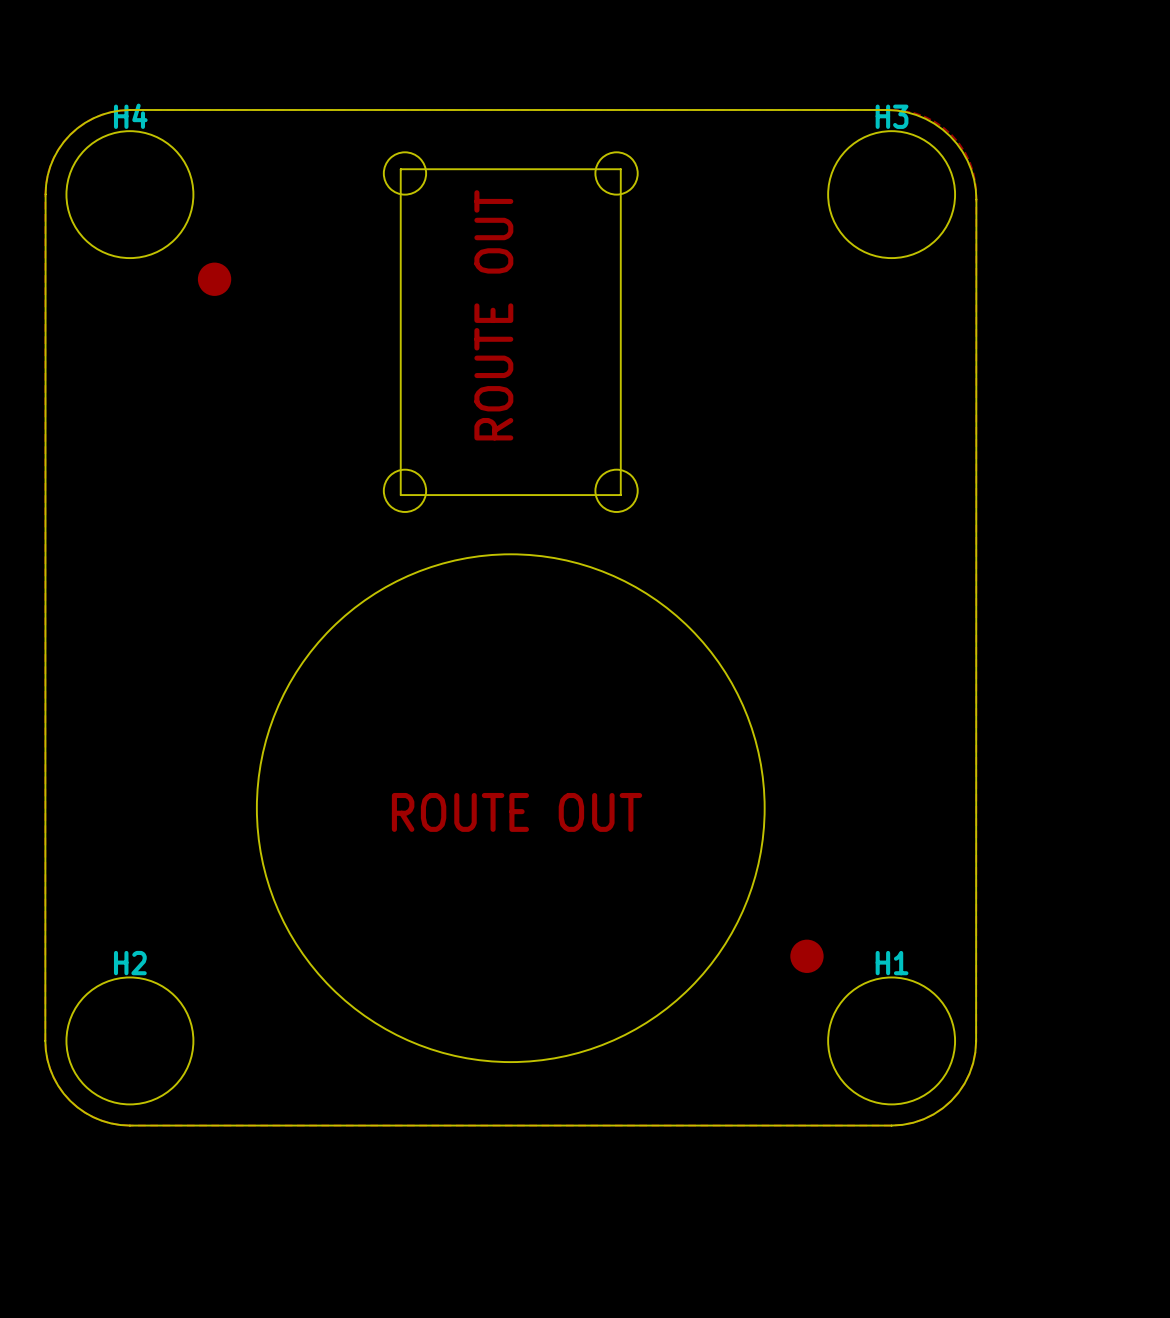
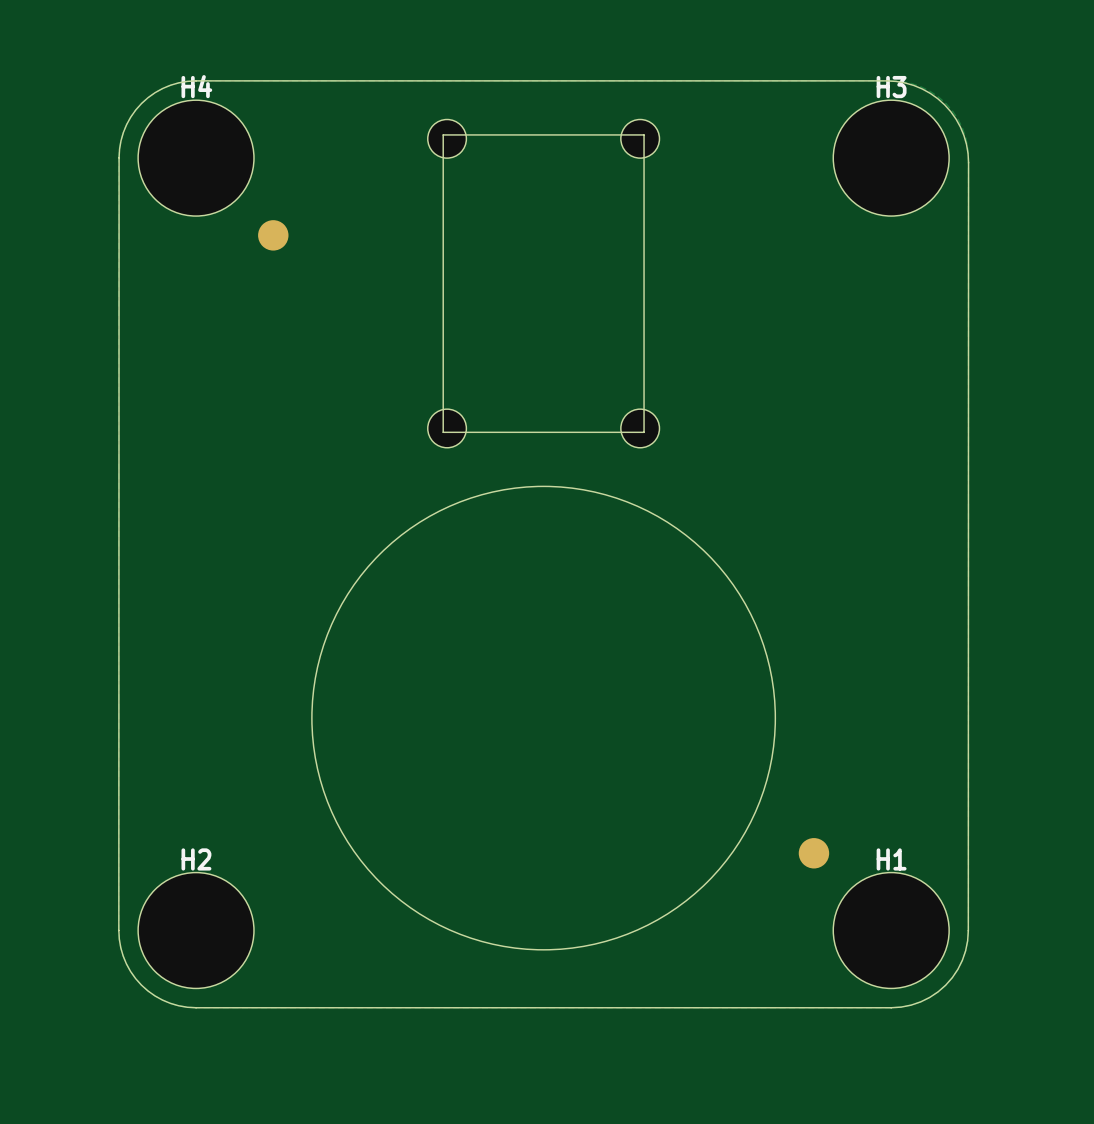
text: ROUTE OUT (493, 315) -> none
text: ROUTE OUT (517, 812) -> none

